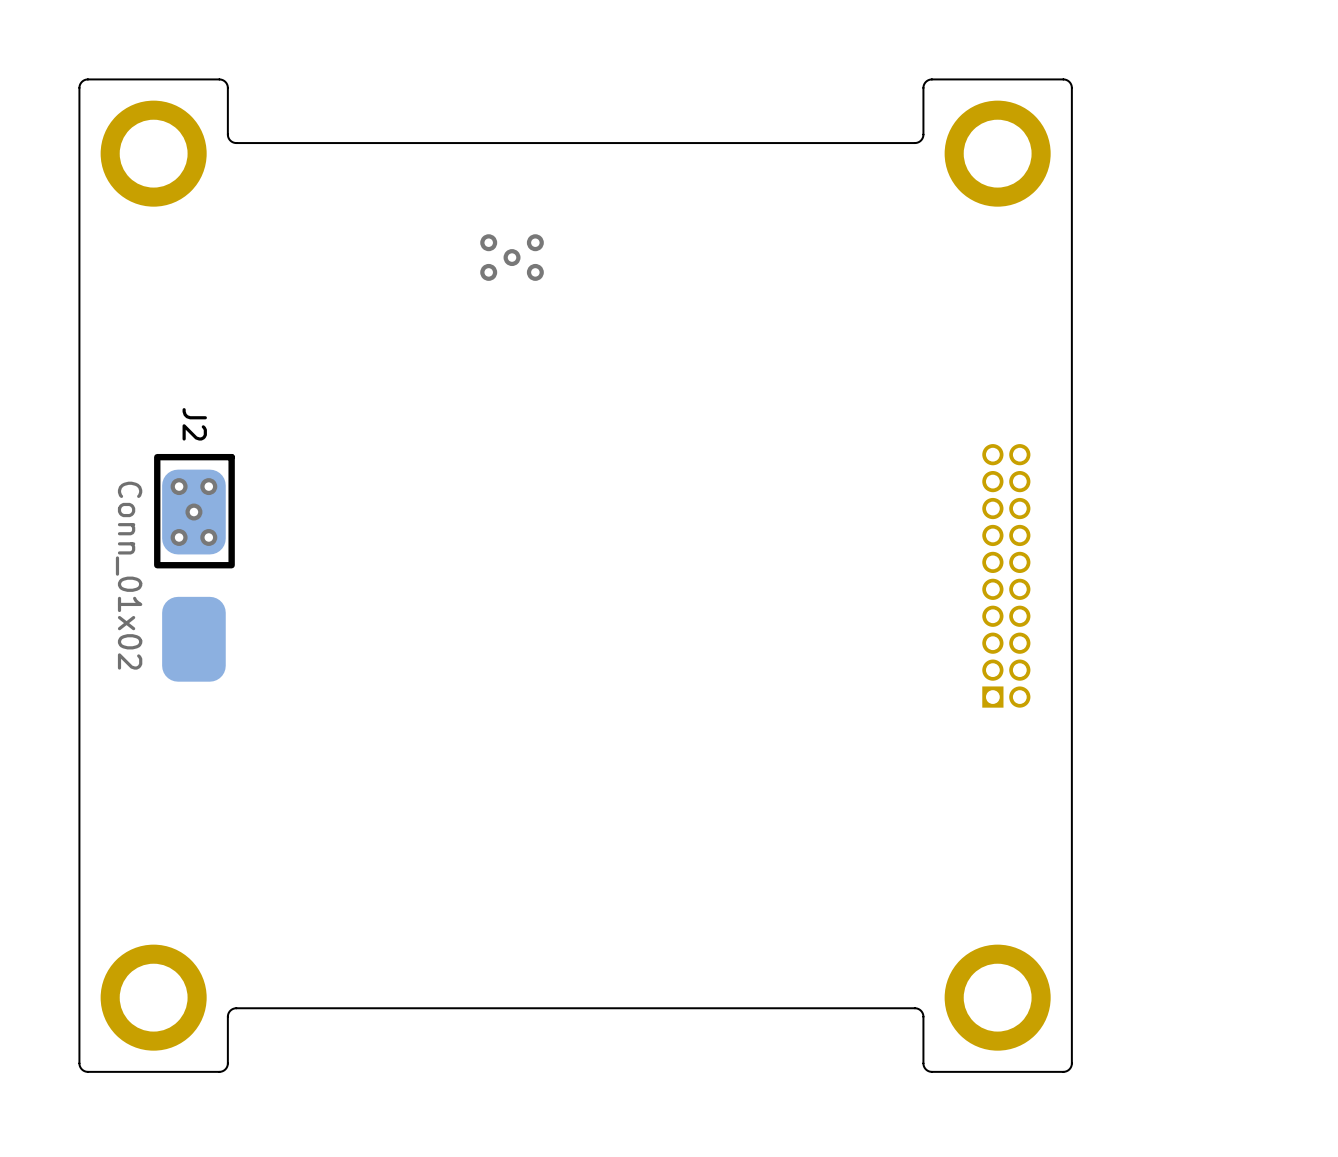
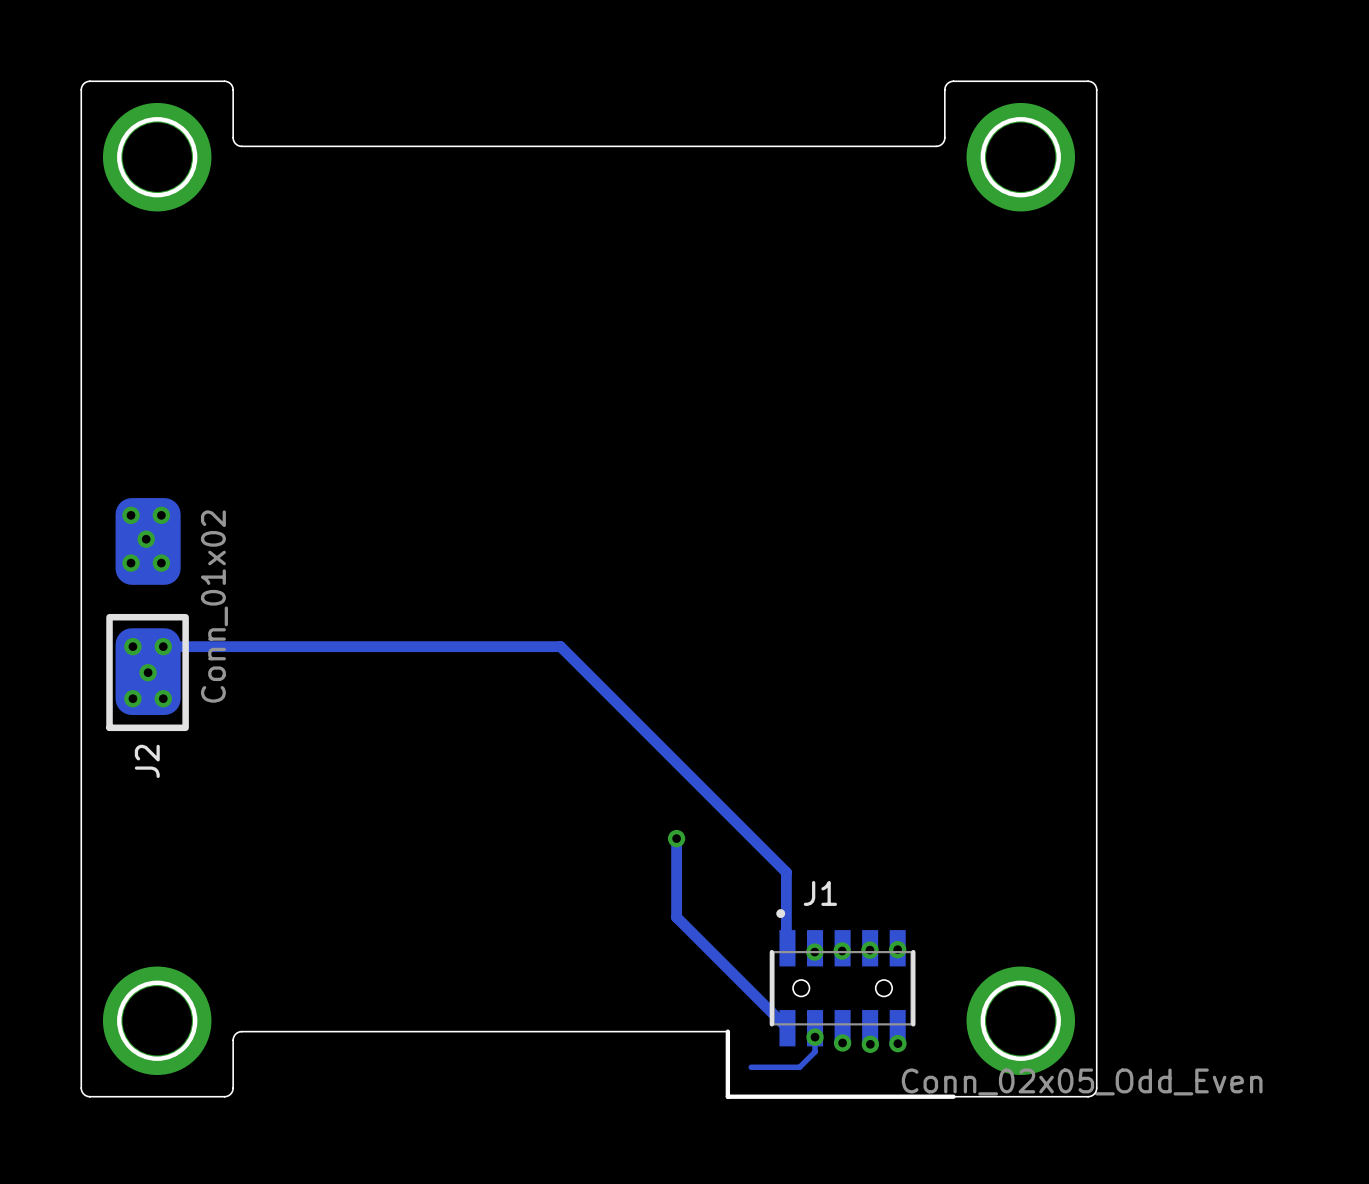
round board edge: none -> [117, 117, 198, 198]
round board edge: none -> [980, 117, 1061, 198]
via: (488, 242) -> none
via: (535, 242) -> none
via: (512, 257) -> none
via: (488, 272) -> none
via: (535, 272) -> none
via: (179, 486) -> none
via: (208, 486) -> none
via: none -> (131, 515)
via: none -> (161, 515)
via: (193, 512) -> none
via: none -> (146, 539)
via: (179, 537) -> none
via: (208, 537) -> none
via: none -> (131, 563)
via: none -> (161, 563)
J2 rotation: 0° (194, 567) -> 180° (147, 614)
part: (1006, 575) -> none
via: none -> (132, 646)
track: none -> (163, 646) (560, 646) (786, 872) (787, 948)
via: none -> (163, 646)
via: none -> (148, 672)
via: none -> (132, 698)
via: none -> (163, 698)
track: none -> (676, 838) (676, 917) (787, 1028)
via: none -> (676, 838)
via: none -> (869, 950)
via: none -> (897, 949)
via: none -> (842, 950)
via: none -> (814, 952)
J1: none -> Conn_02x05_Odd_Even (842, 977)
round board edge: none -> [117, 980, 198, 1061]
round board edge: none -> [980, 980, 1061, 1061]
track: none -> (815, 1028) (815, 1051) (799, 1067) (751, 1067)
board edge: (711, 1008) (917, 1008) (923, 1015) (923, 1065) (926, 1070) (931, 1071) -> (727, 1031) (727, 1096) (953, 1096)
via: none -> (815, 1037)
via: none -> (842, 1042)
via: none -> (870, 1044)
via: none -> (897, 1043)

